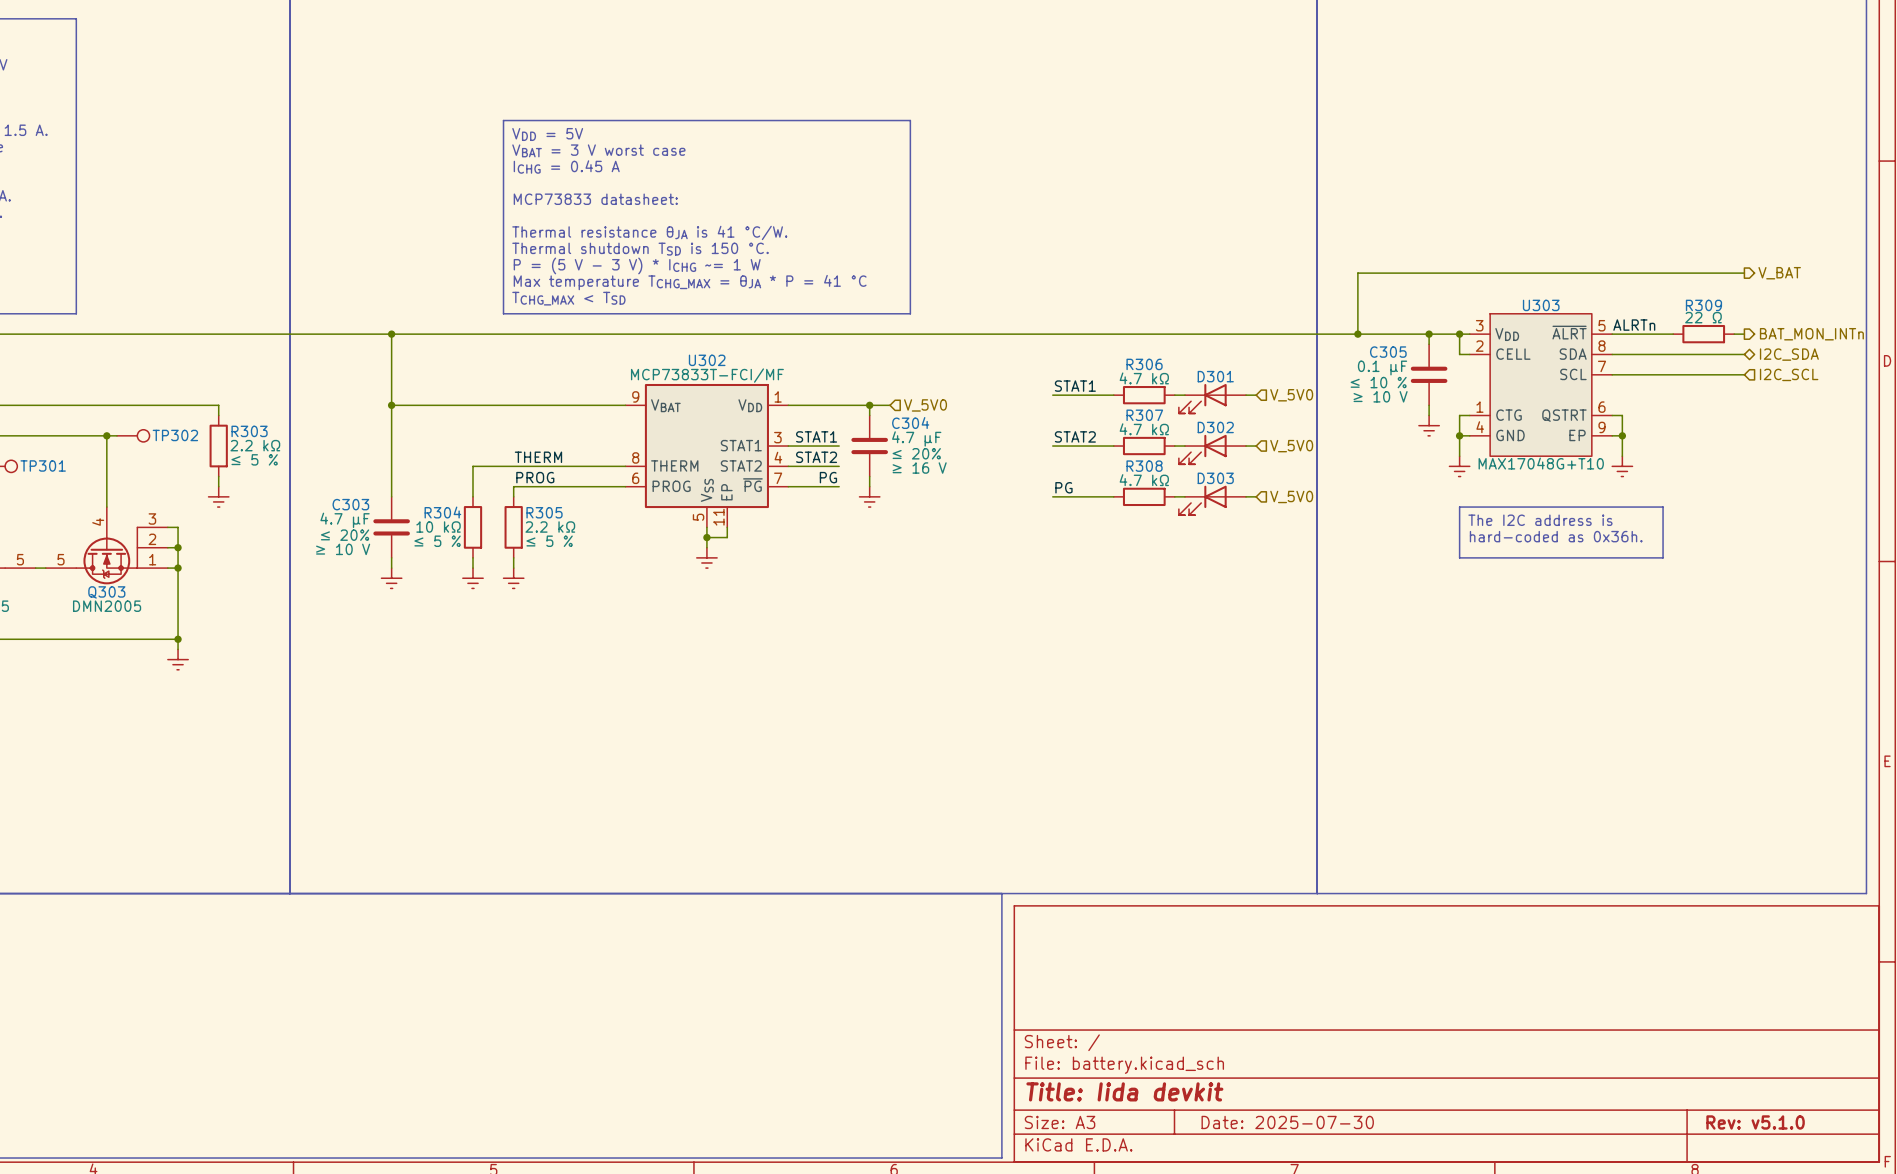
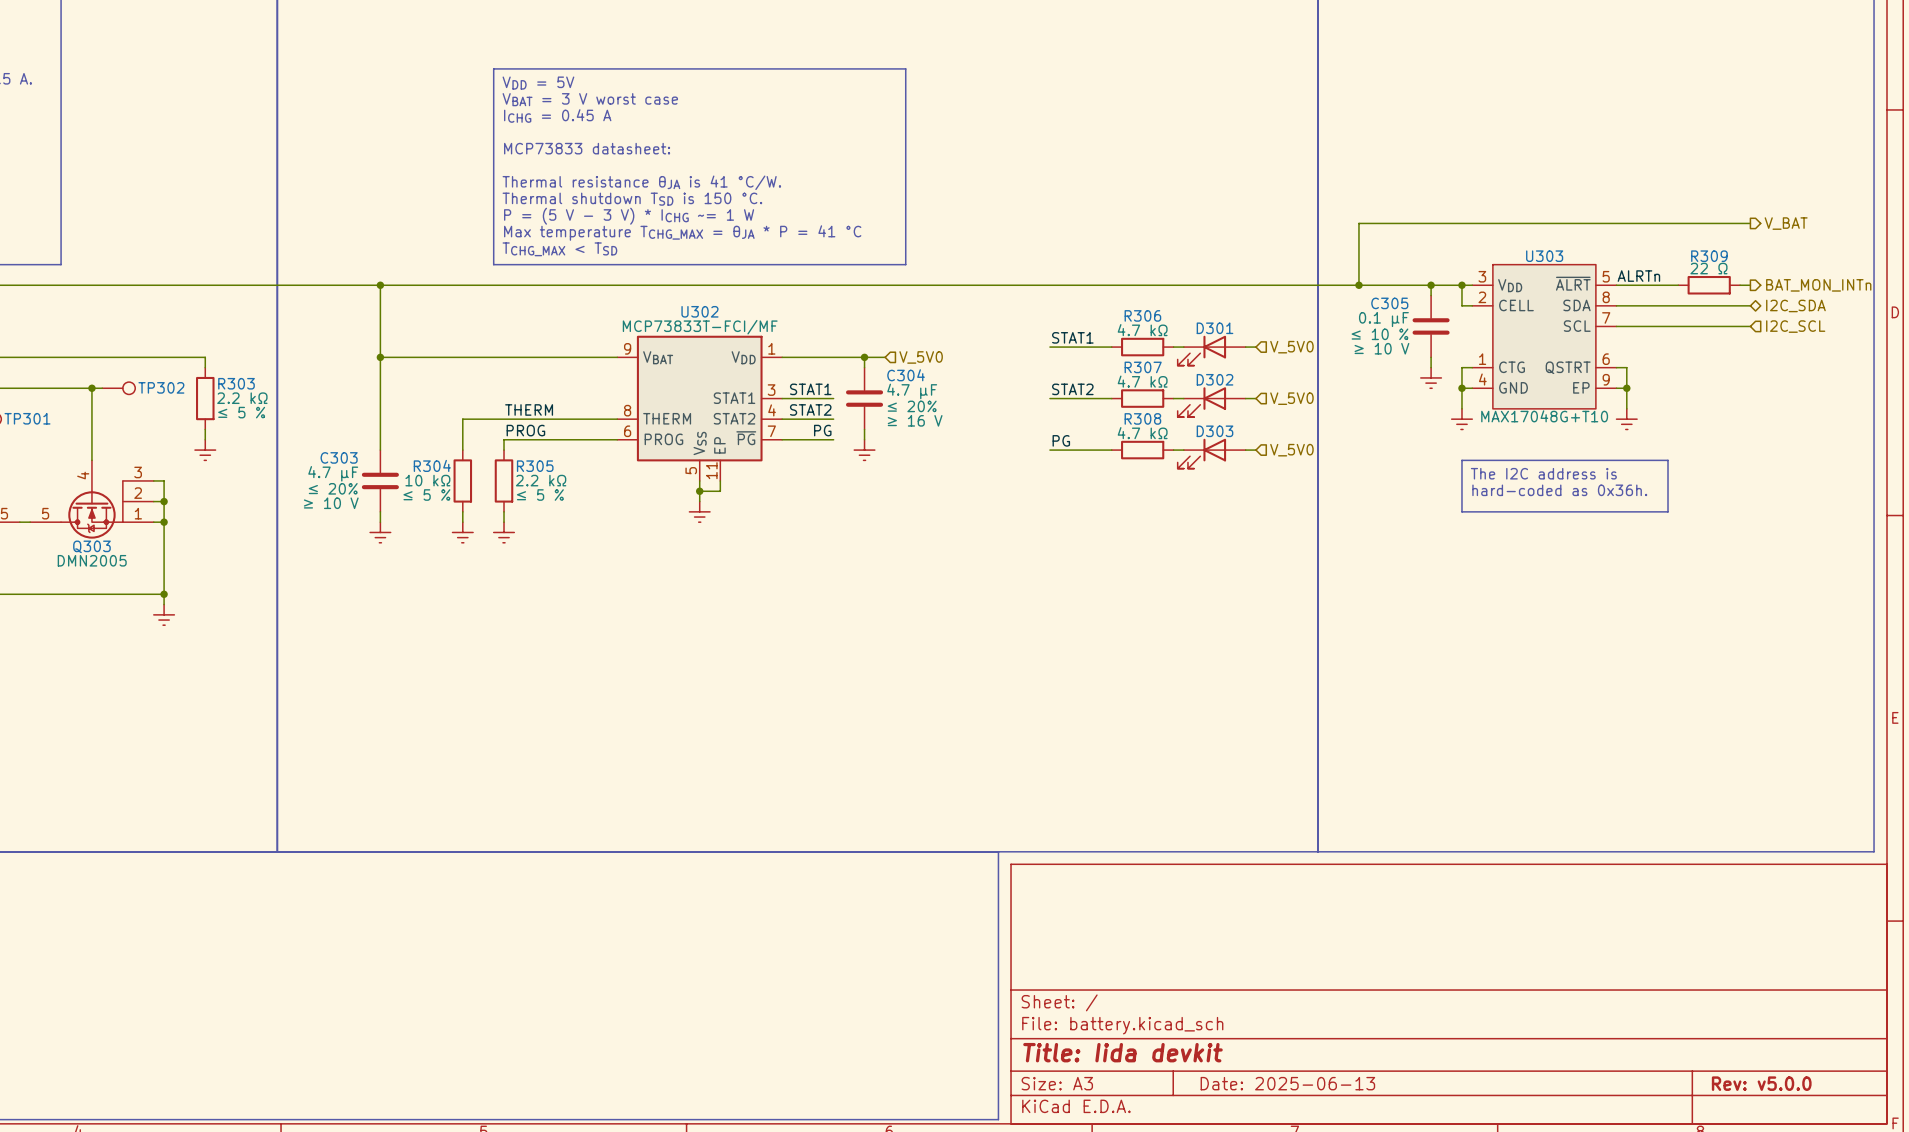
title block: Date: 2025-07-30 (1287, 1122) -> Date: 2025-06-13 (1287, 1083)
title block: Rev: v5.1.0 (1755, 1122) -> Rev: v5.0.0 (1761, 1083)

